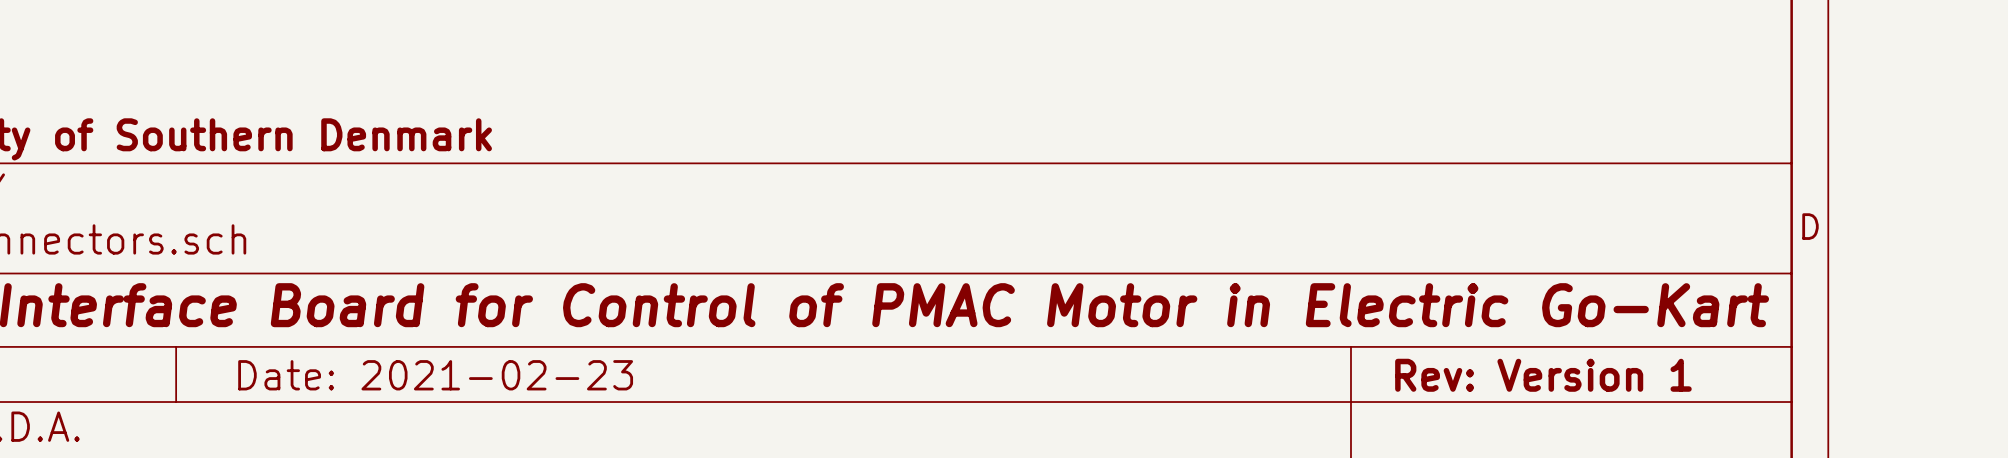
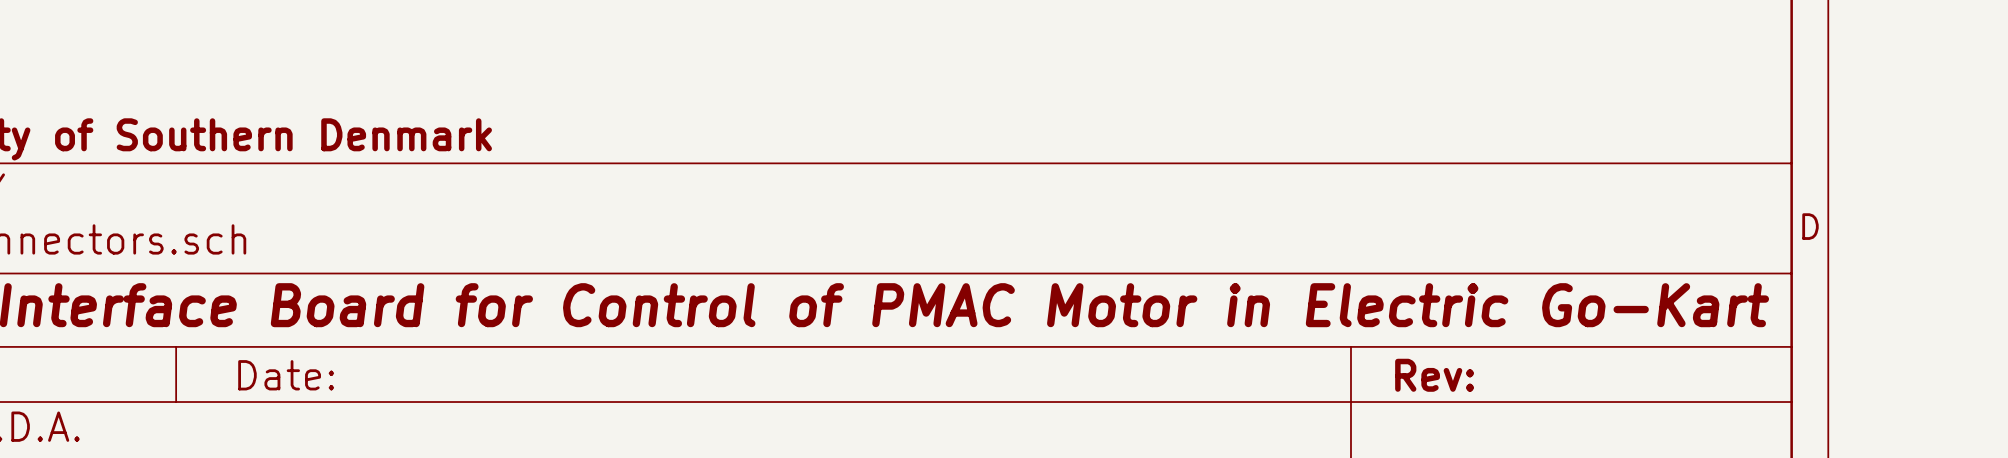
title block: Date: 2021-02-23 (435, 375) -> Date: (286, 375)
title block: Rev: Version 1 (1543, 375) -> Rev: (1434, 375)

